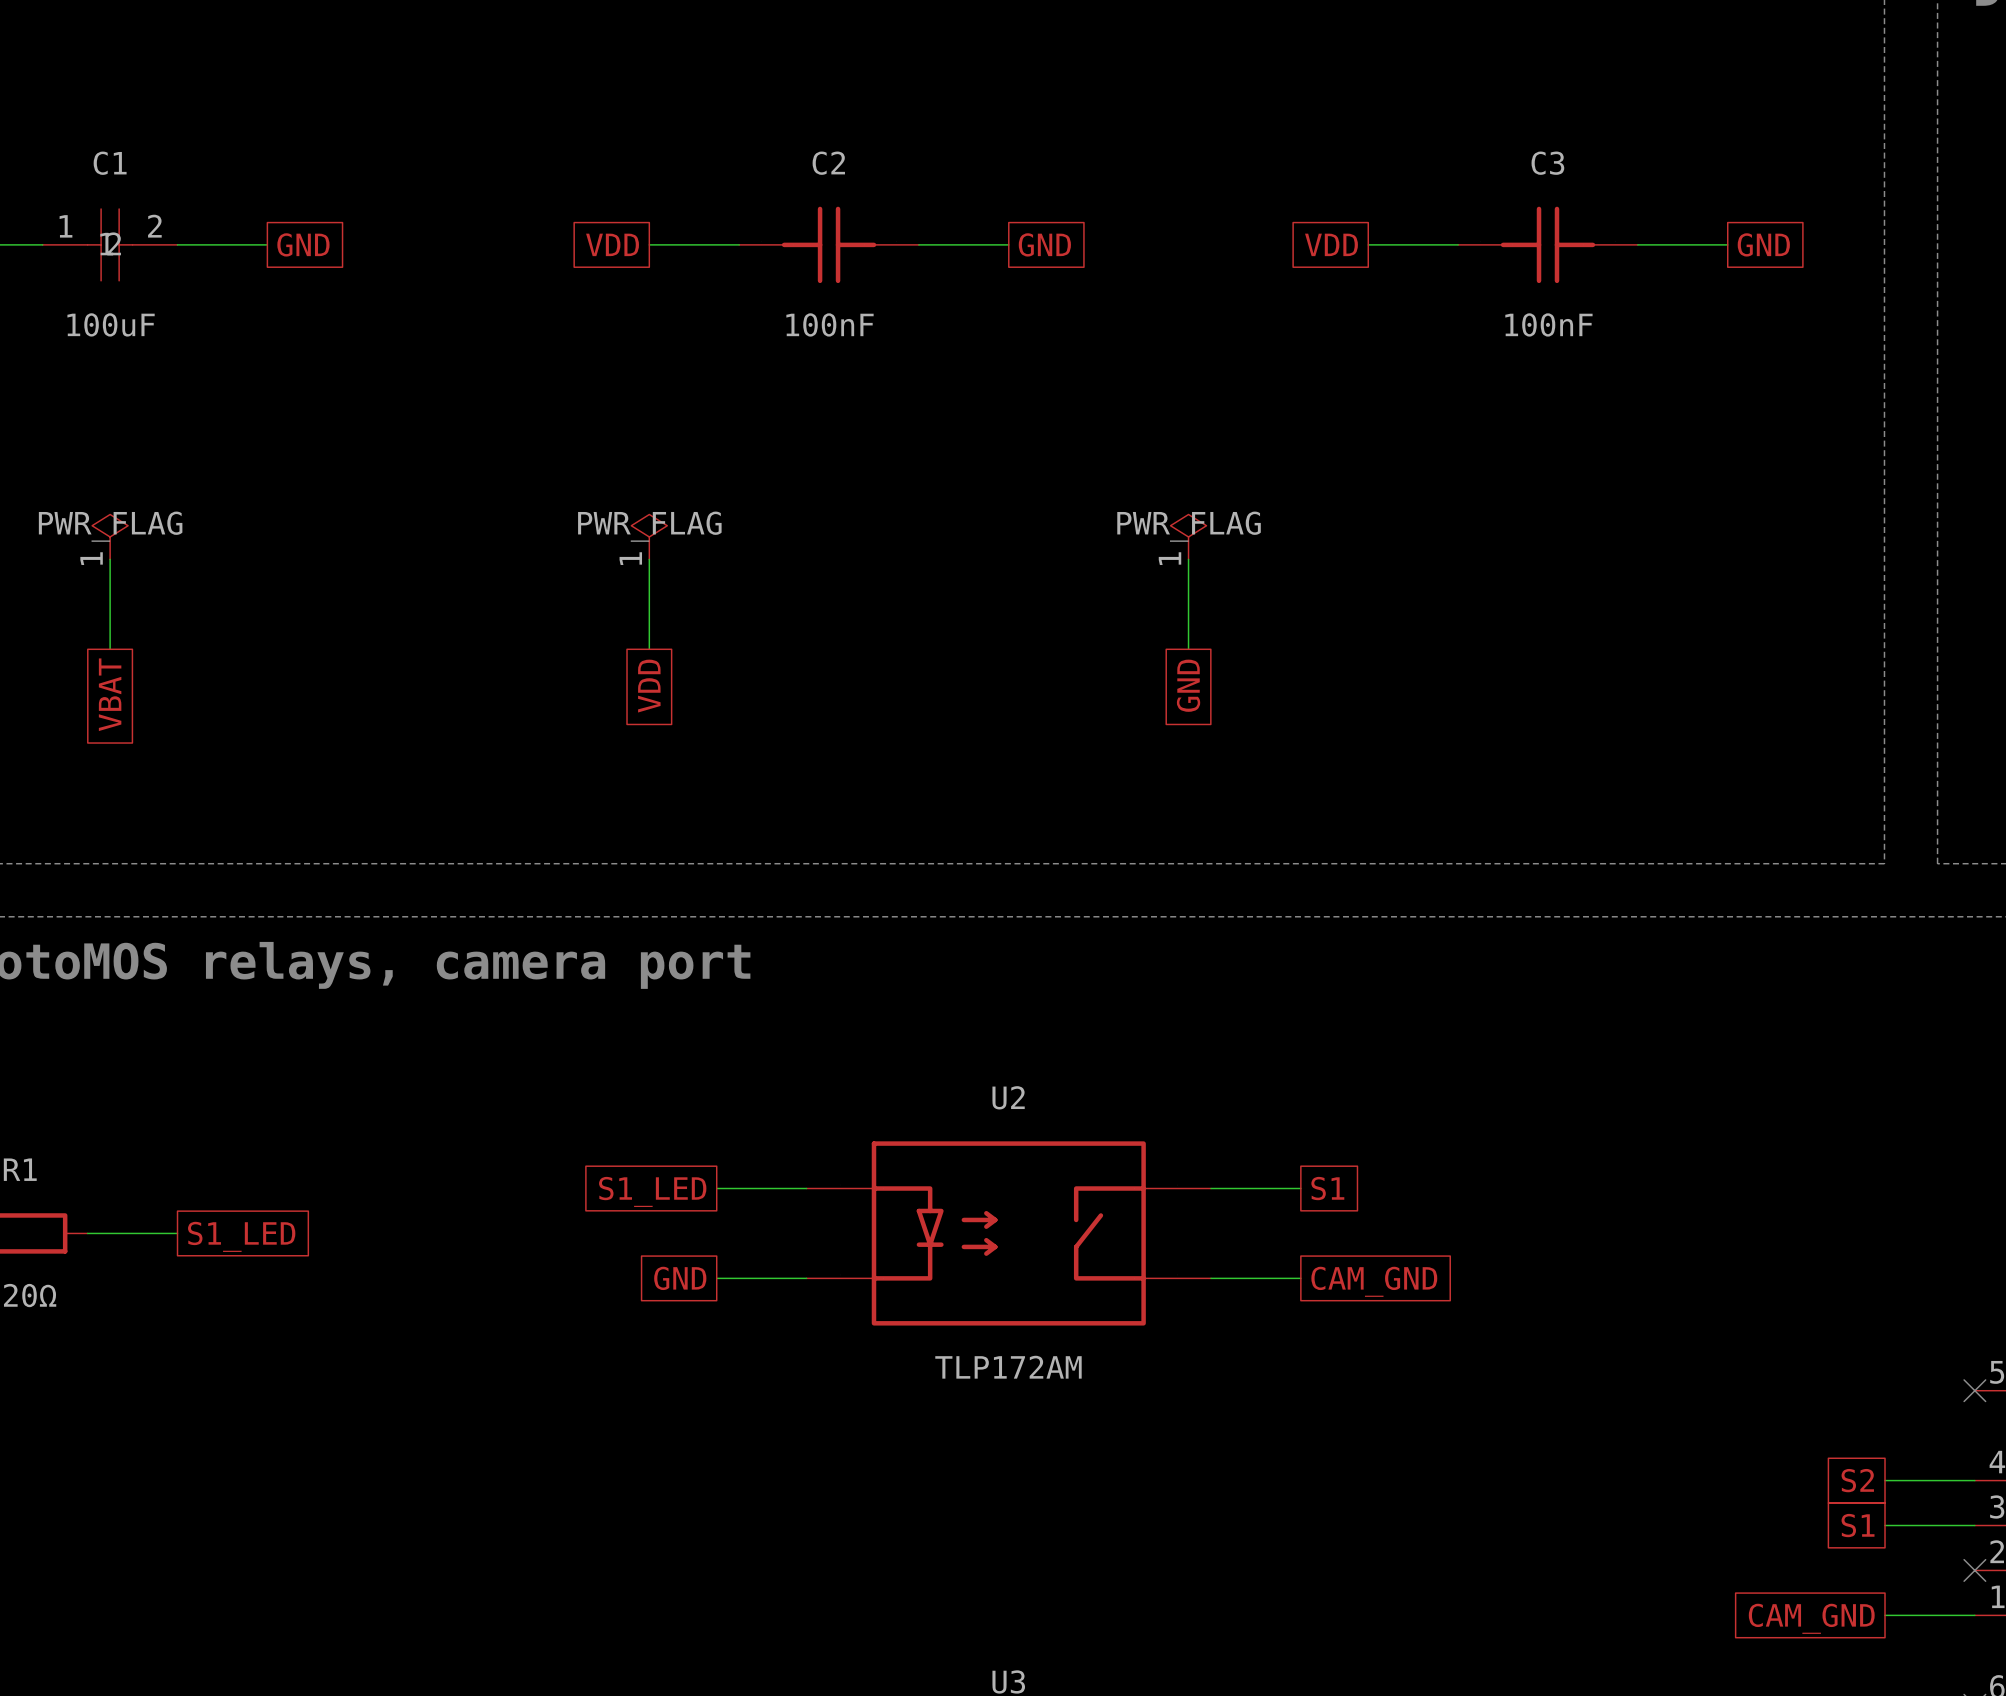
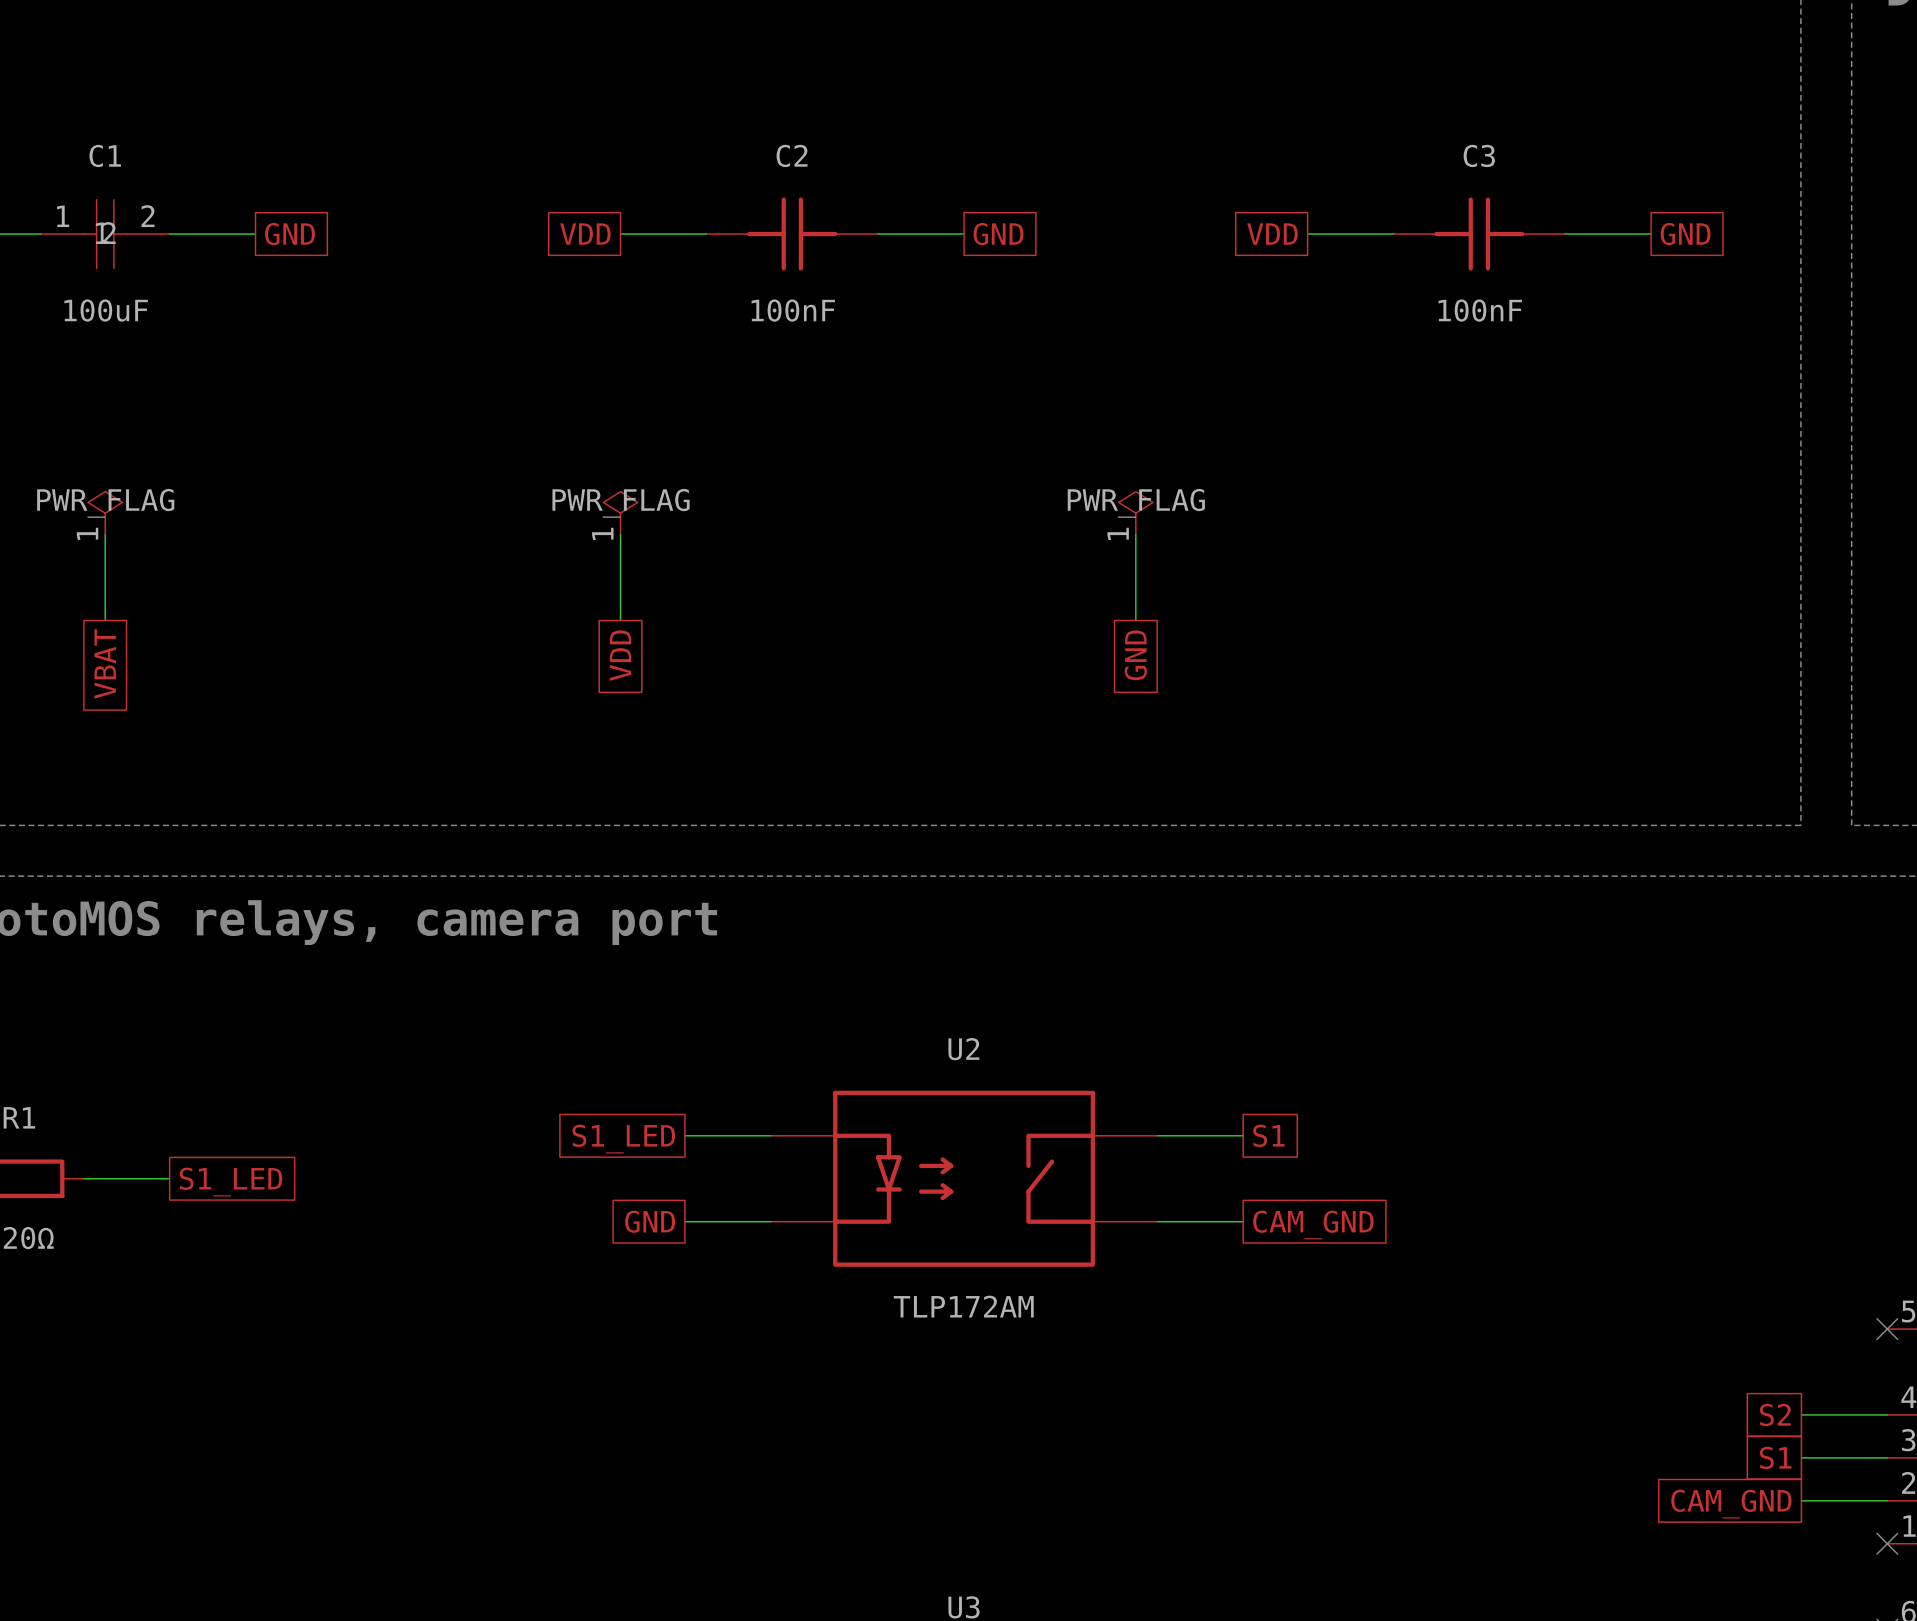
no-connect mark position: (1974, 1570) -> (1887, 1543)
wire: (1885, 1615) (1974, 1615) -> (1801, 1500) (1887, 1500)
global label position: CAM_GND (1811, 1618) -> CAM_GND (1731, 1504)

